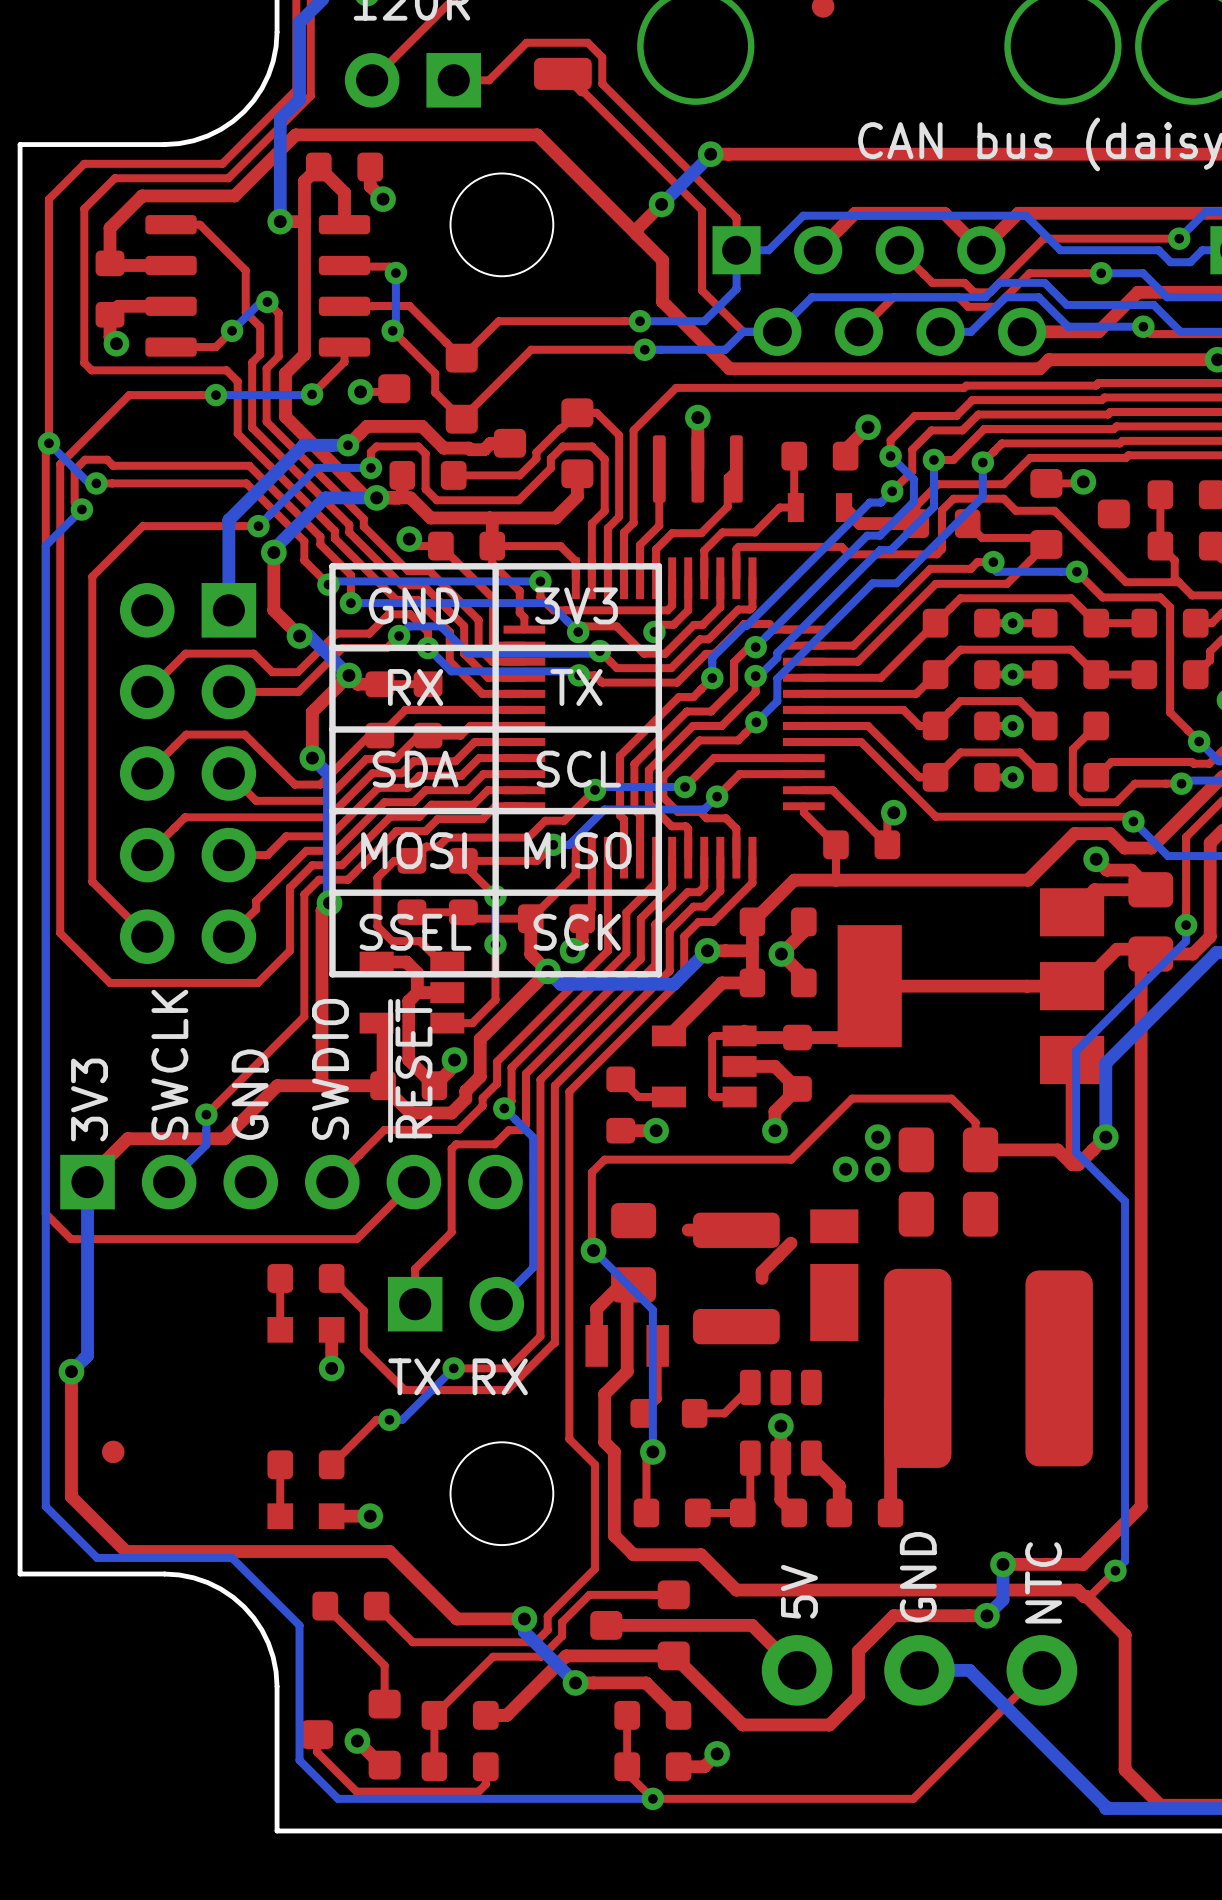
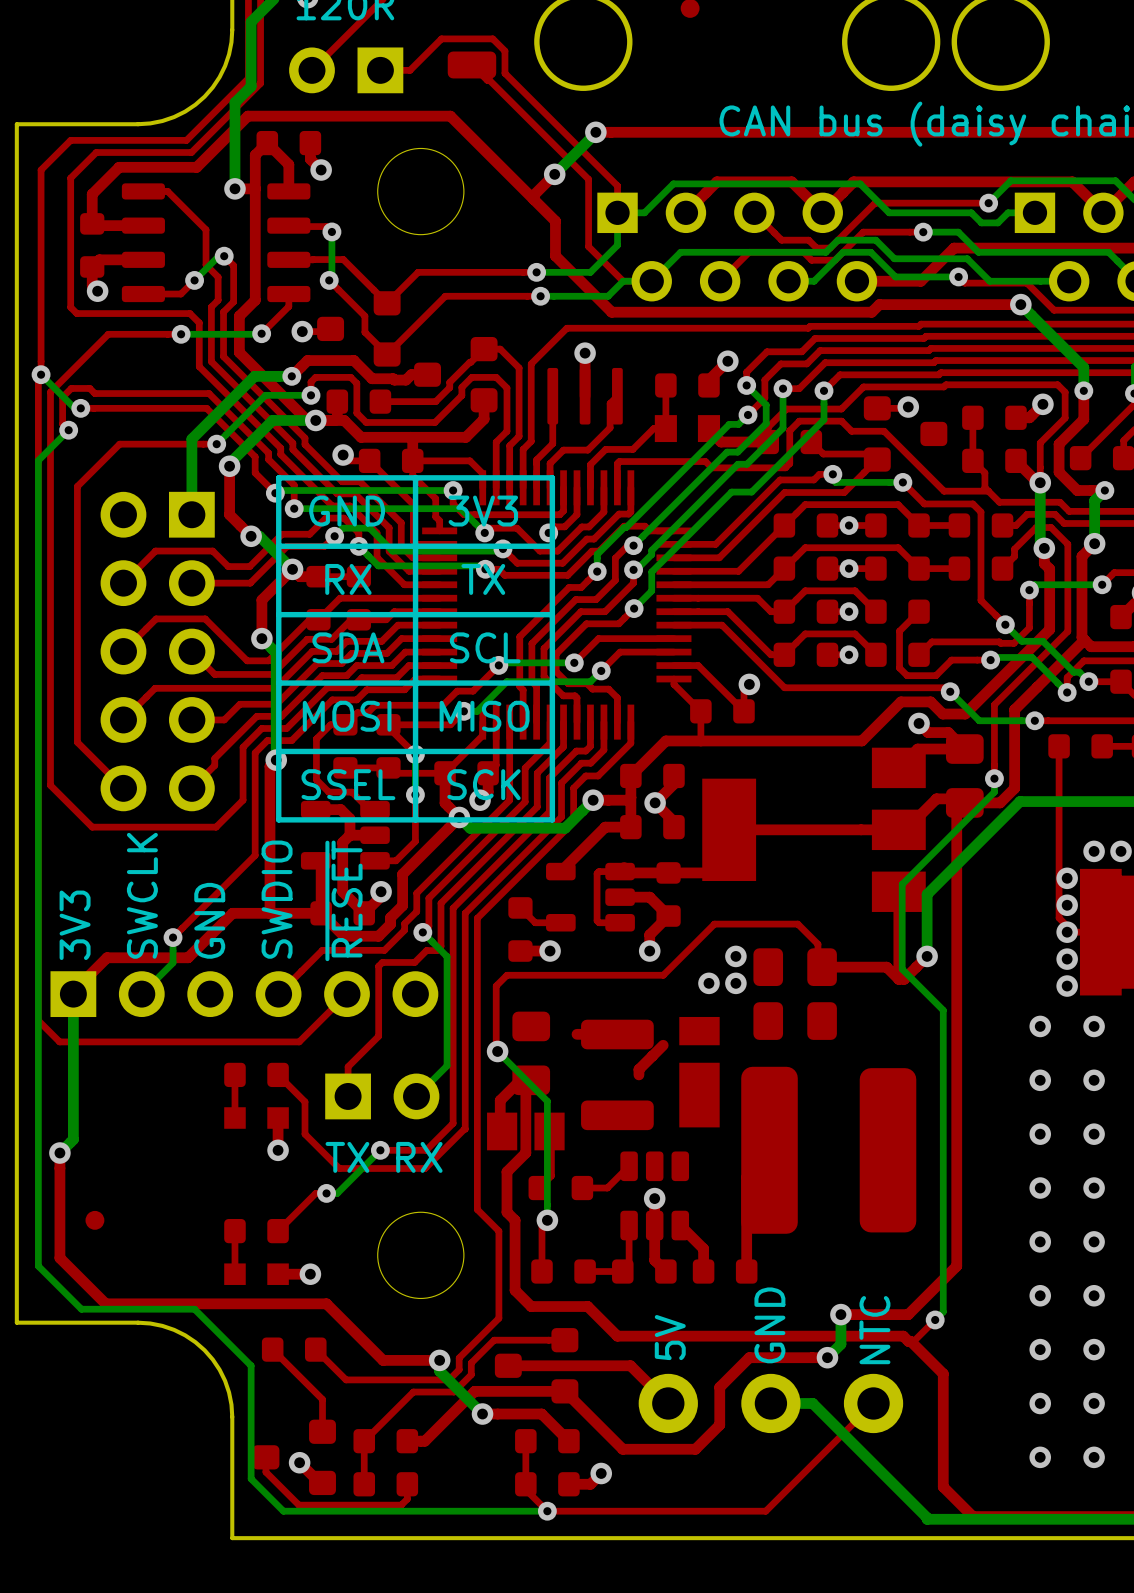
part footprint: [787, 493, 853, 522] -> [654, 415, 721, 443]
part footprint: [359, 951, 465, 1034] -> [300, 800, 390, 870]
part footprint: [651, 1025, 757, 1108] -> [546, 862, 635, 932]
part footprint: [585, 1325, 669, 1367] -> [487, 1112, 565, 1151]

